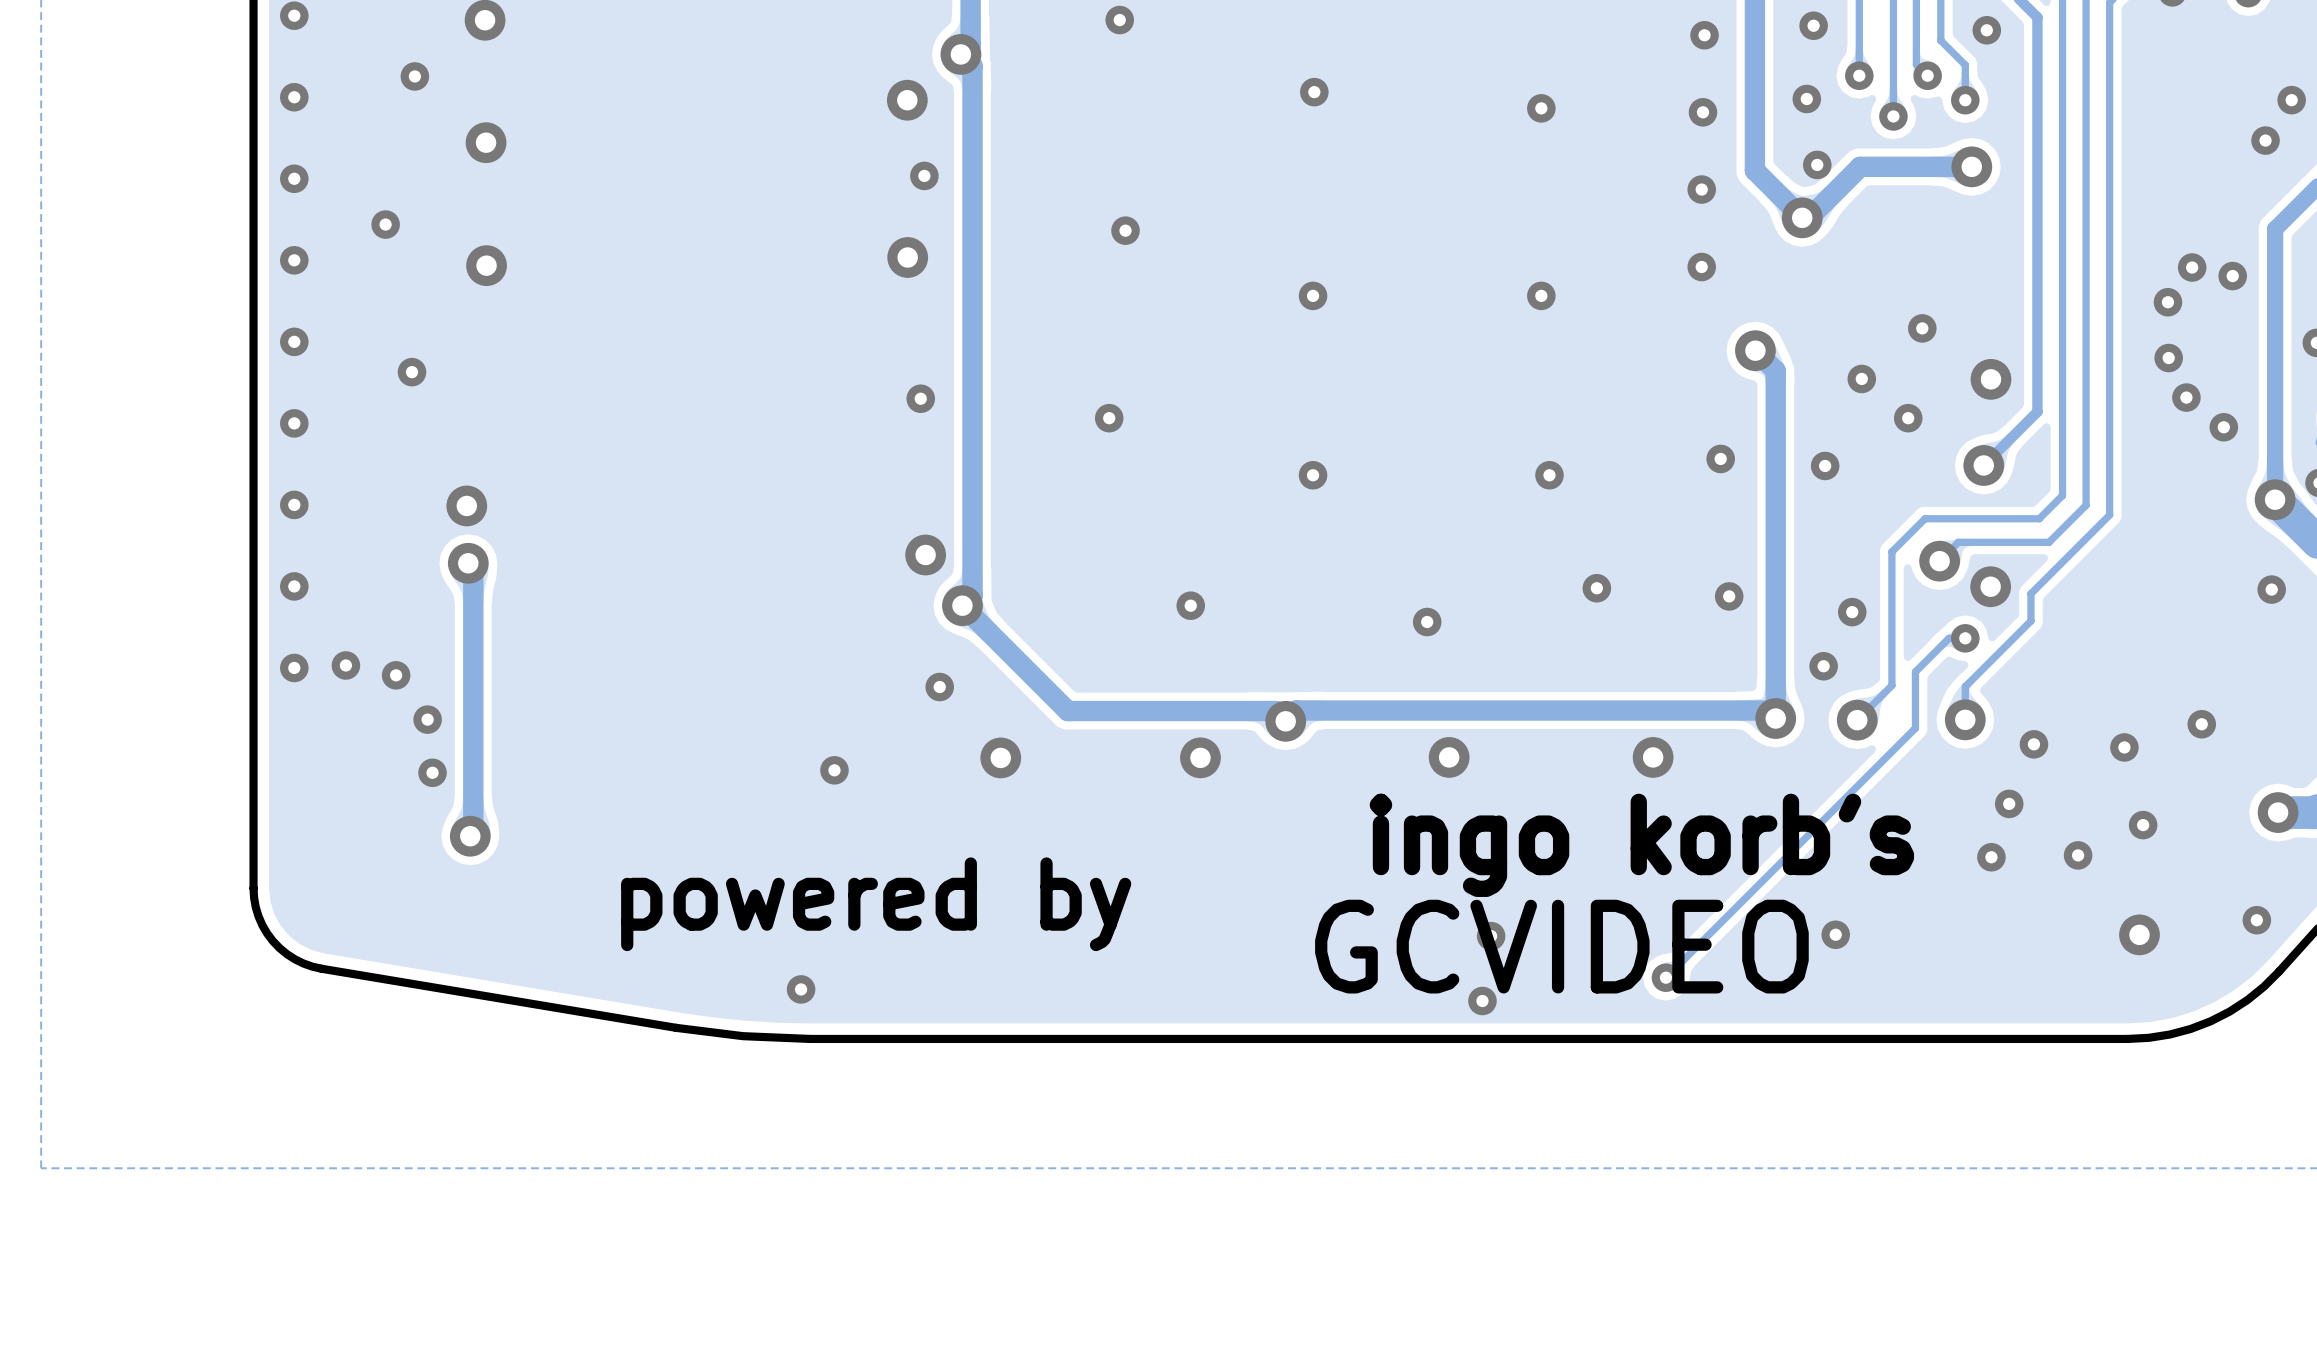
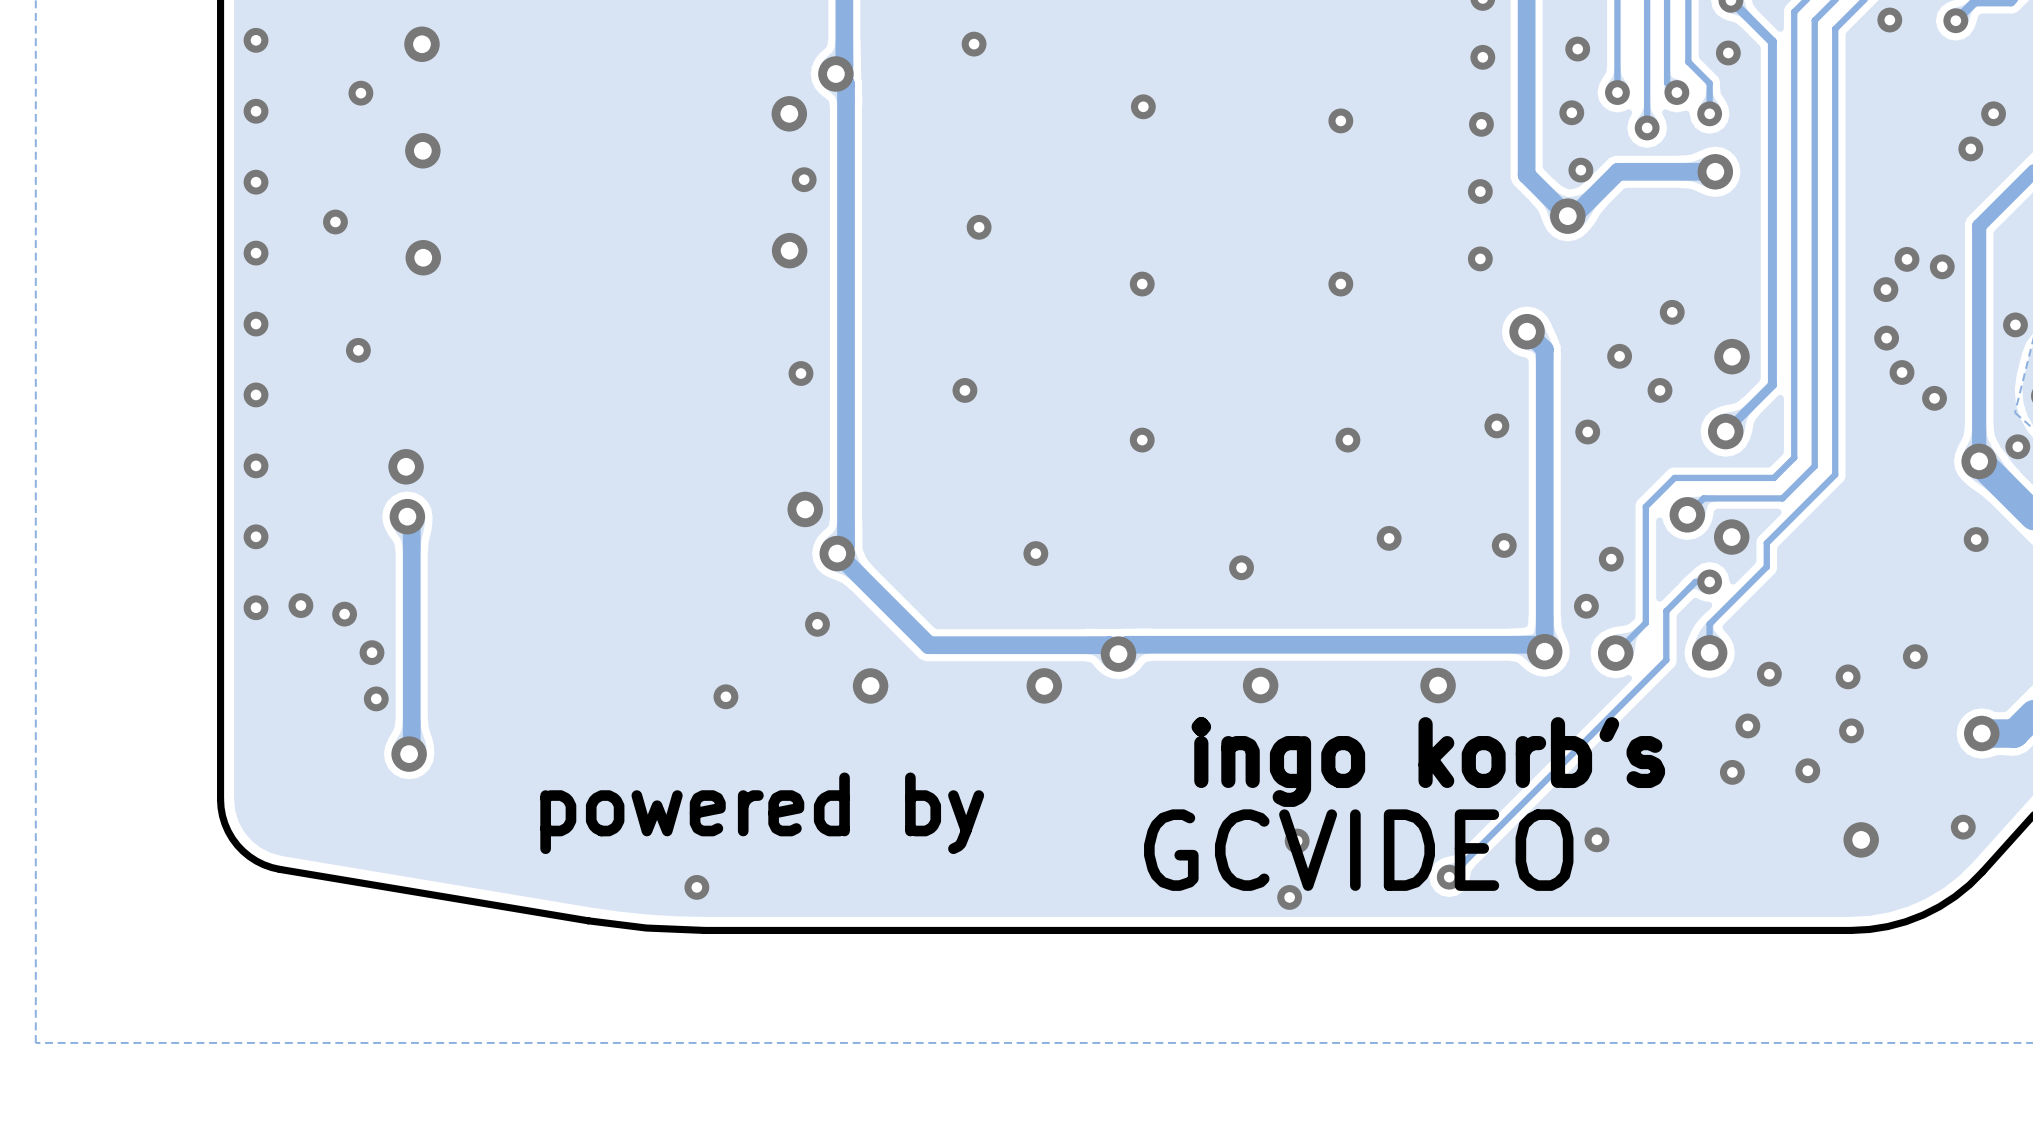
via position: (2143, 825) -> (1851, 730)

